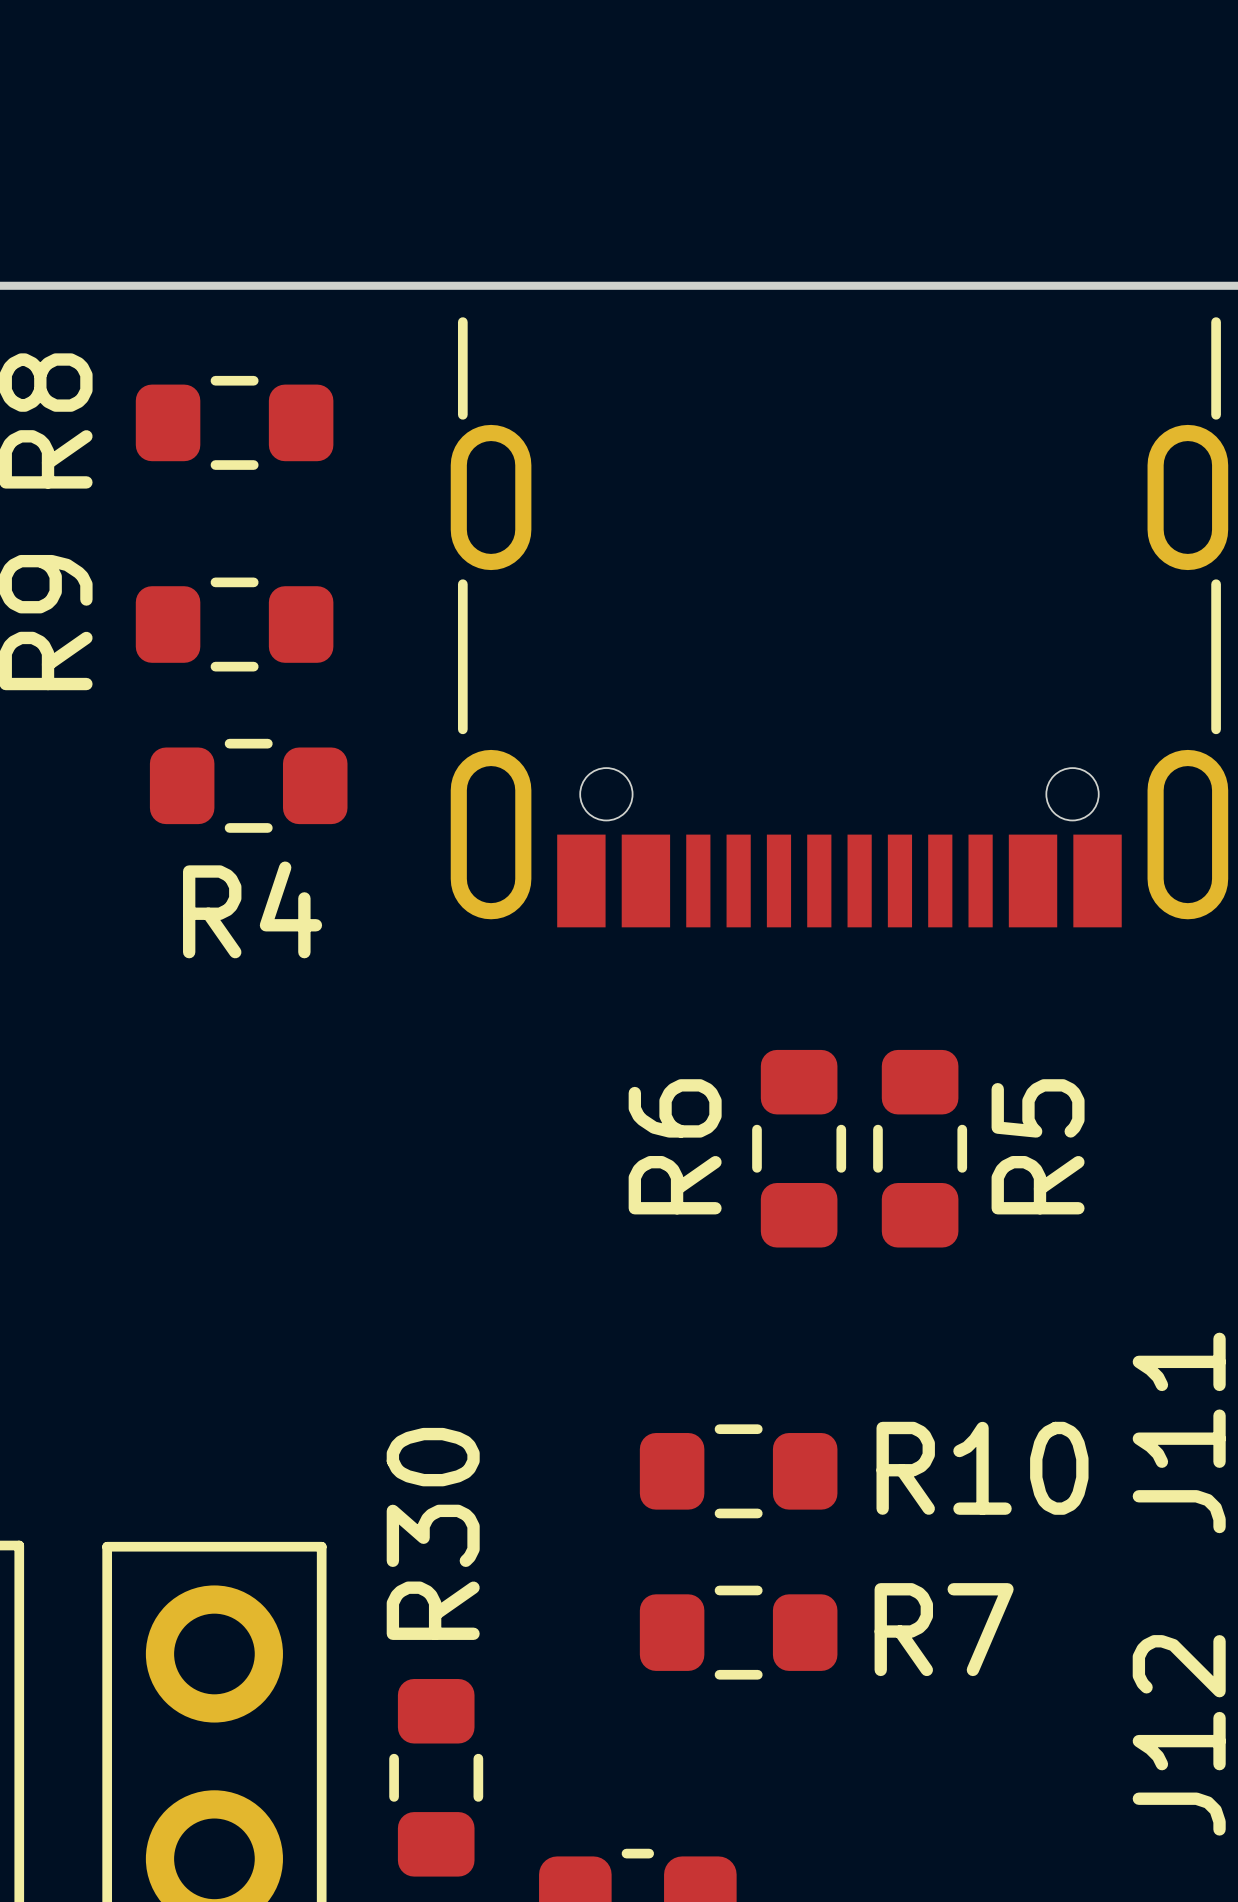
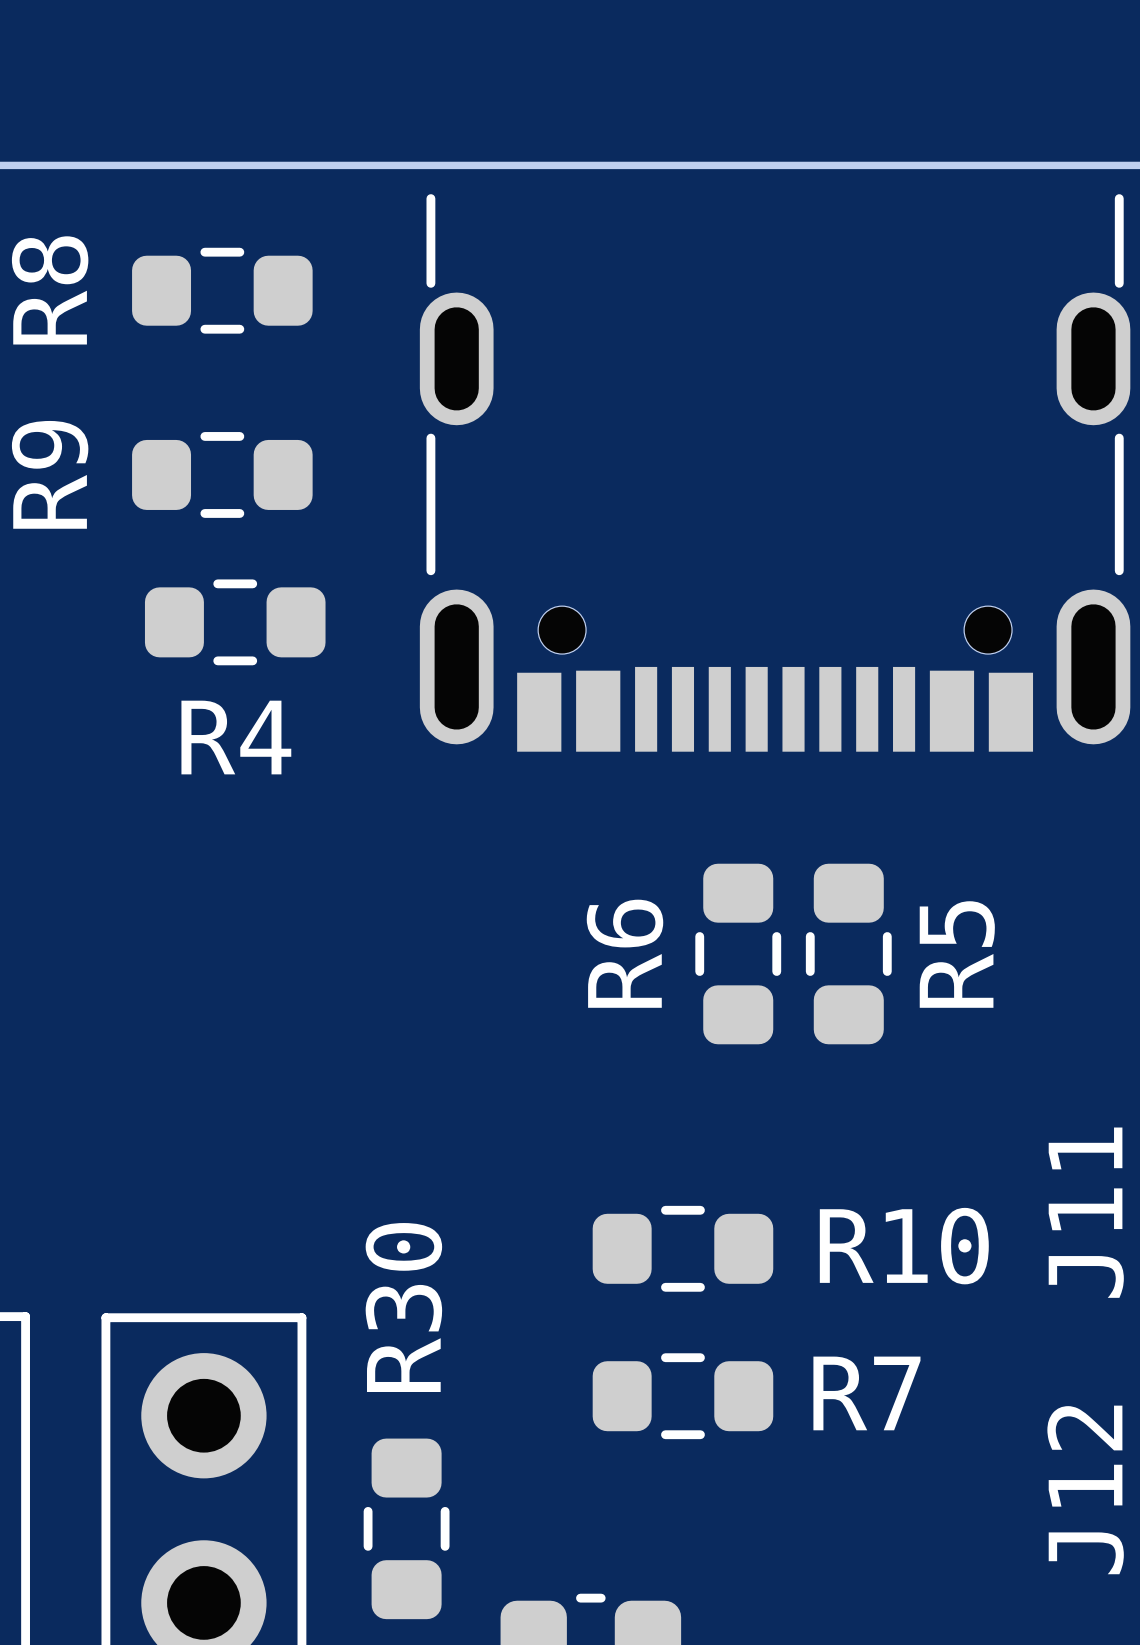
part footprint: [450, 317, 1229, 928] -> [419, 194, 1131, 752]

